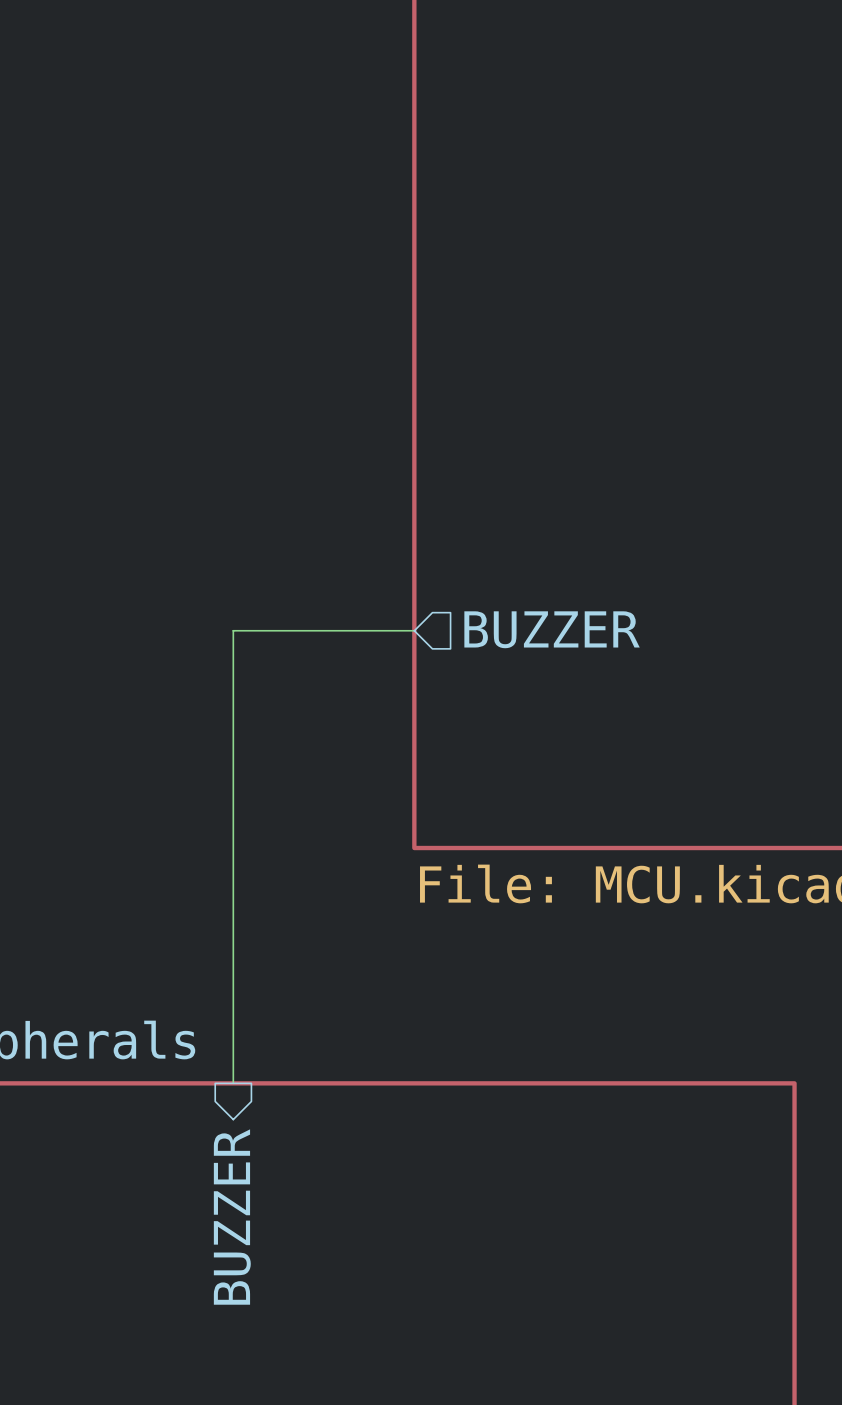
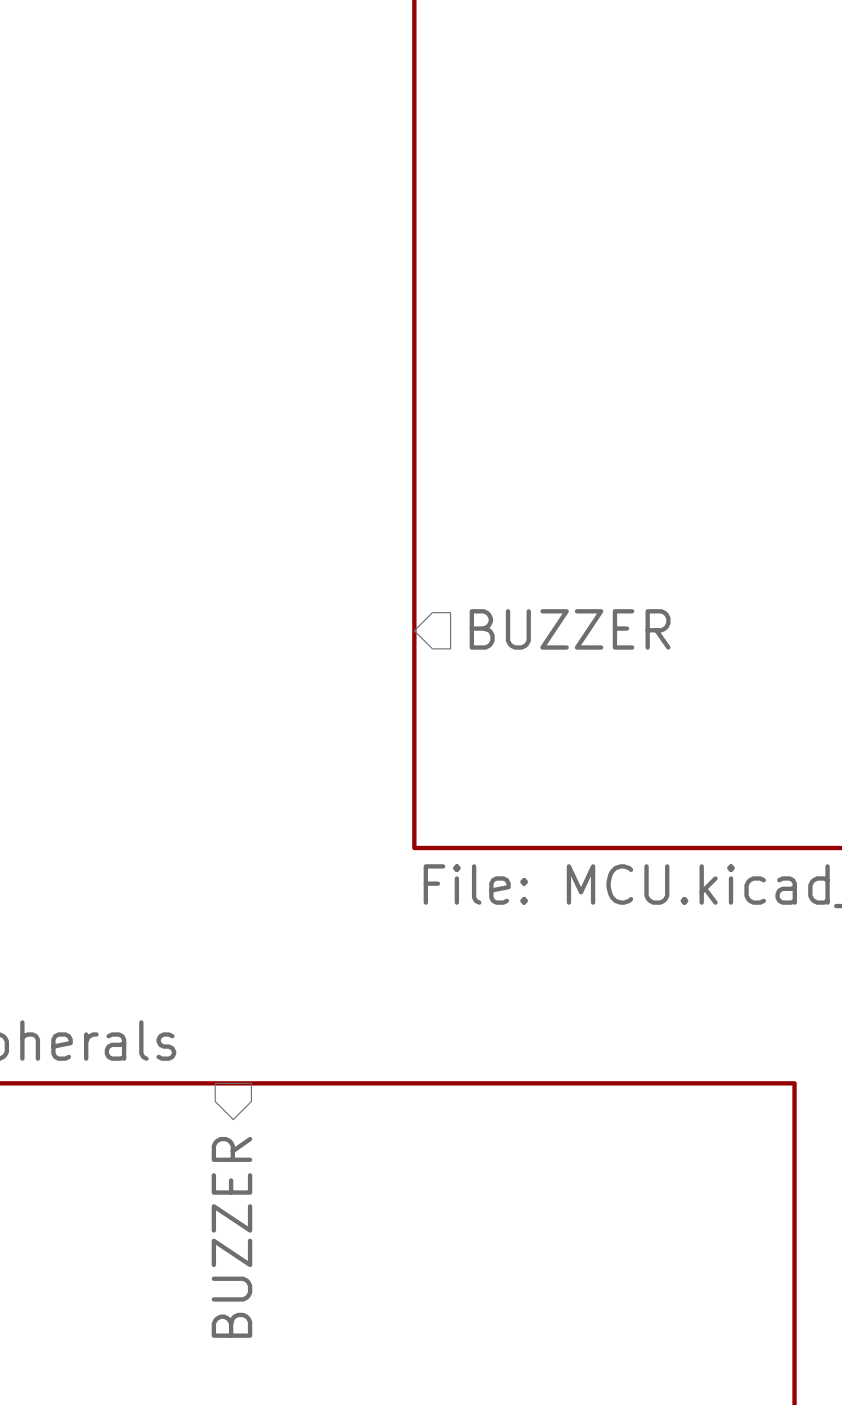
wire: (414, 630) (233, 630) (233, 1083) -> none

